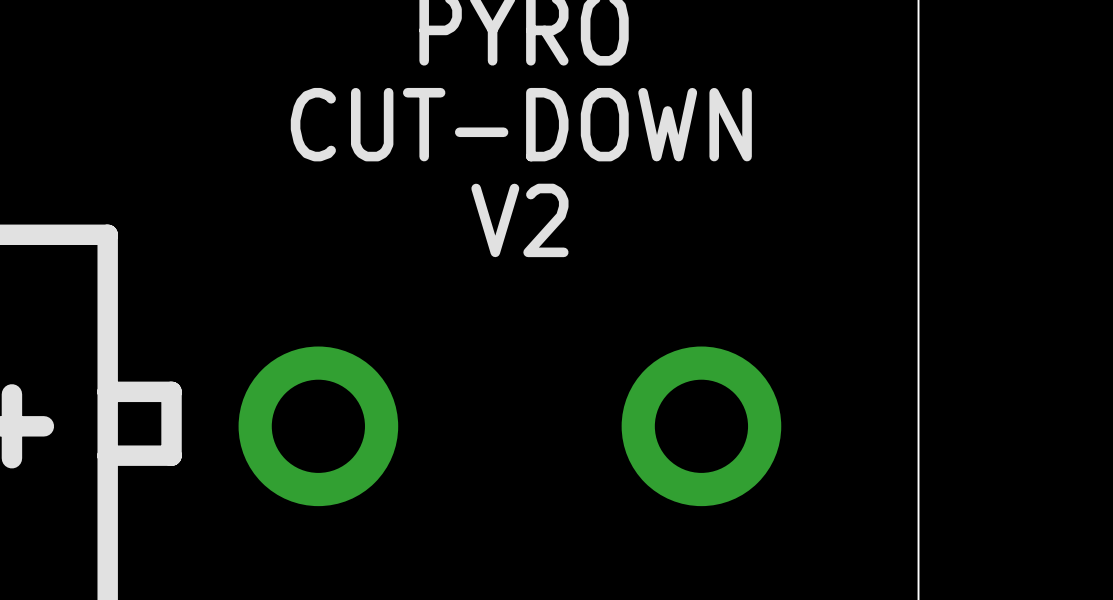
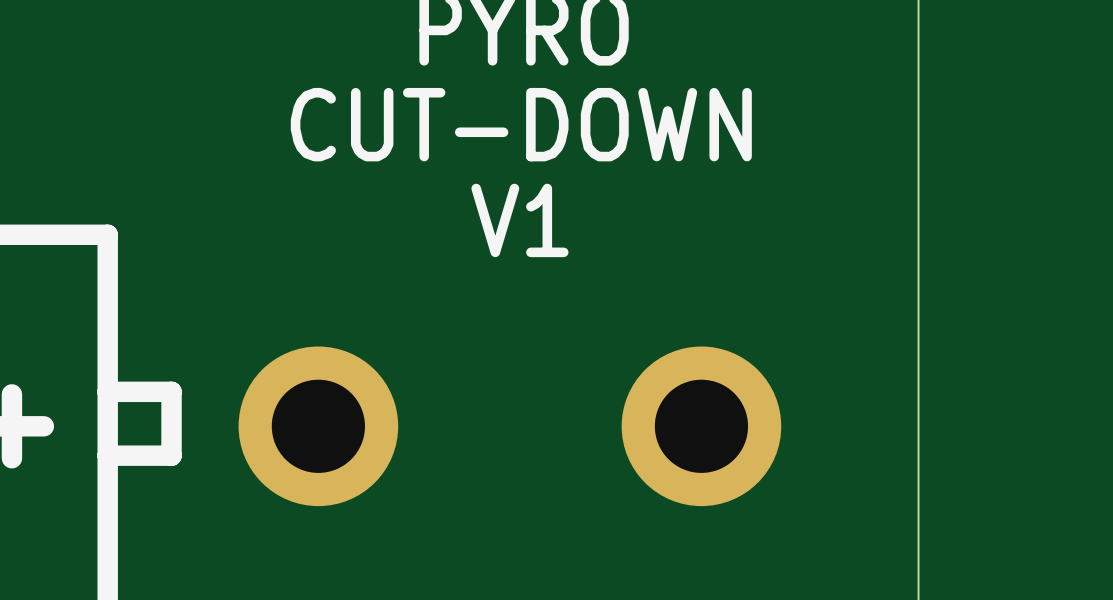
text: V2 (519, 220) -> V1 (519, 220)

